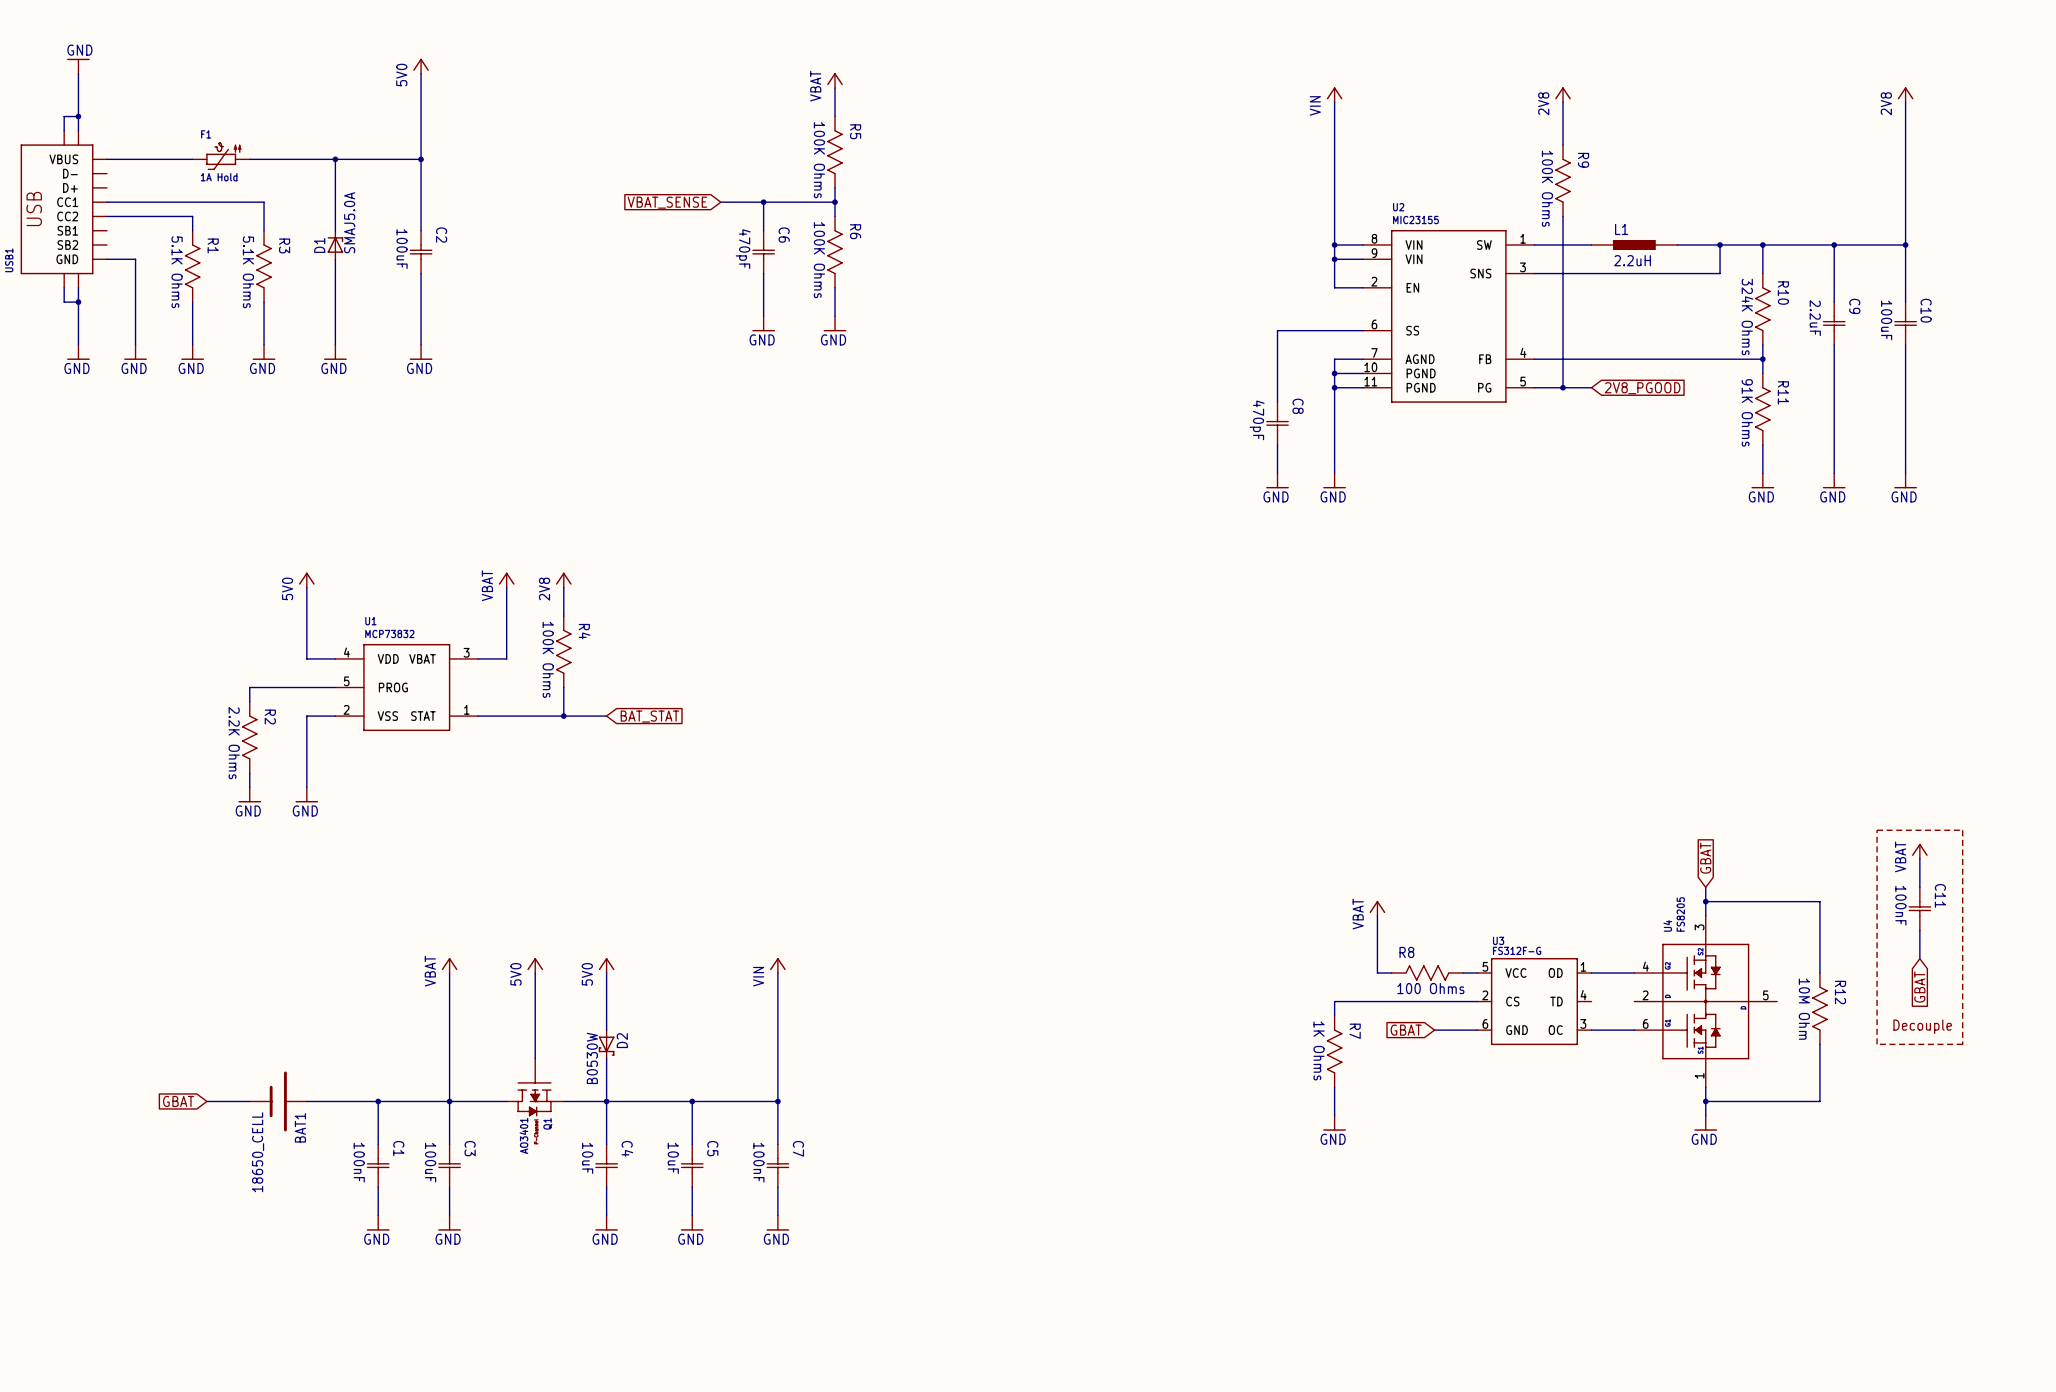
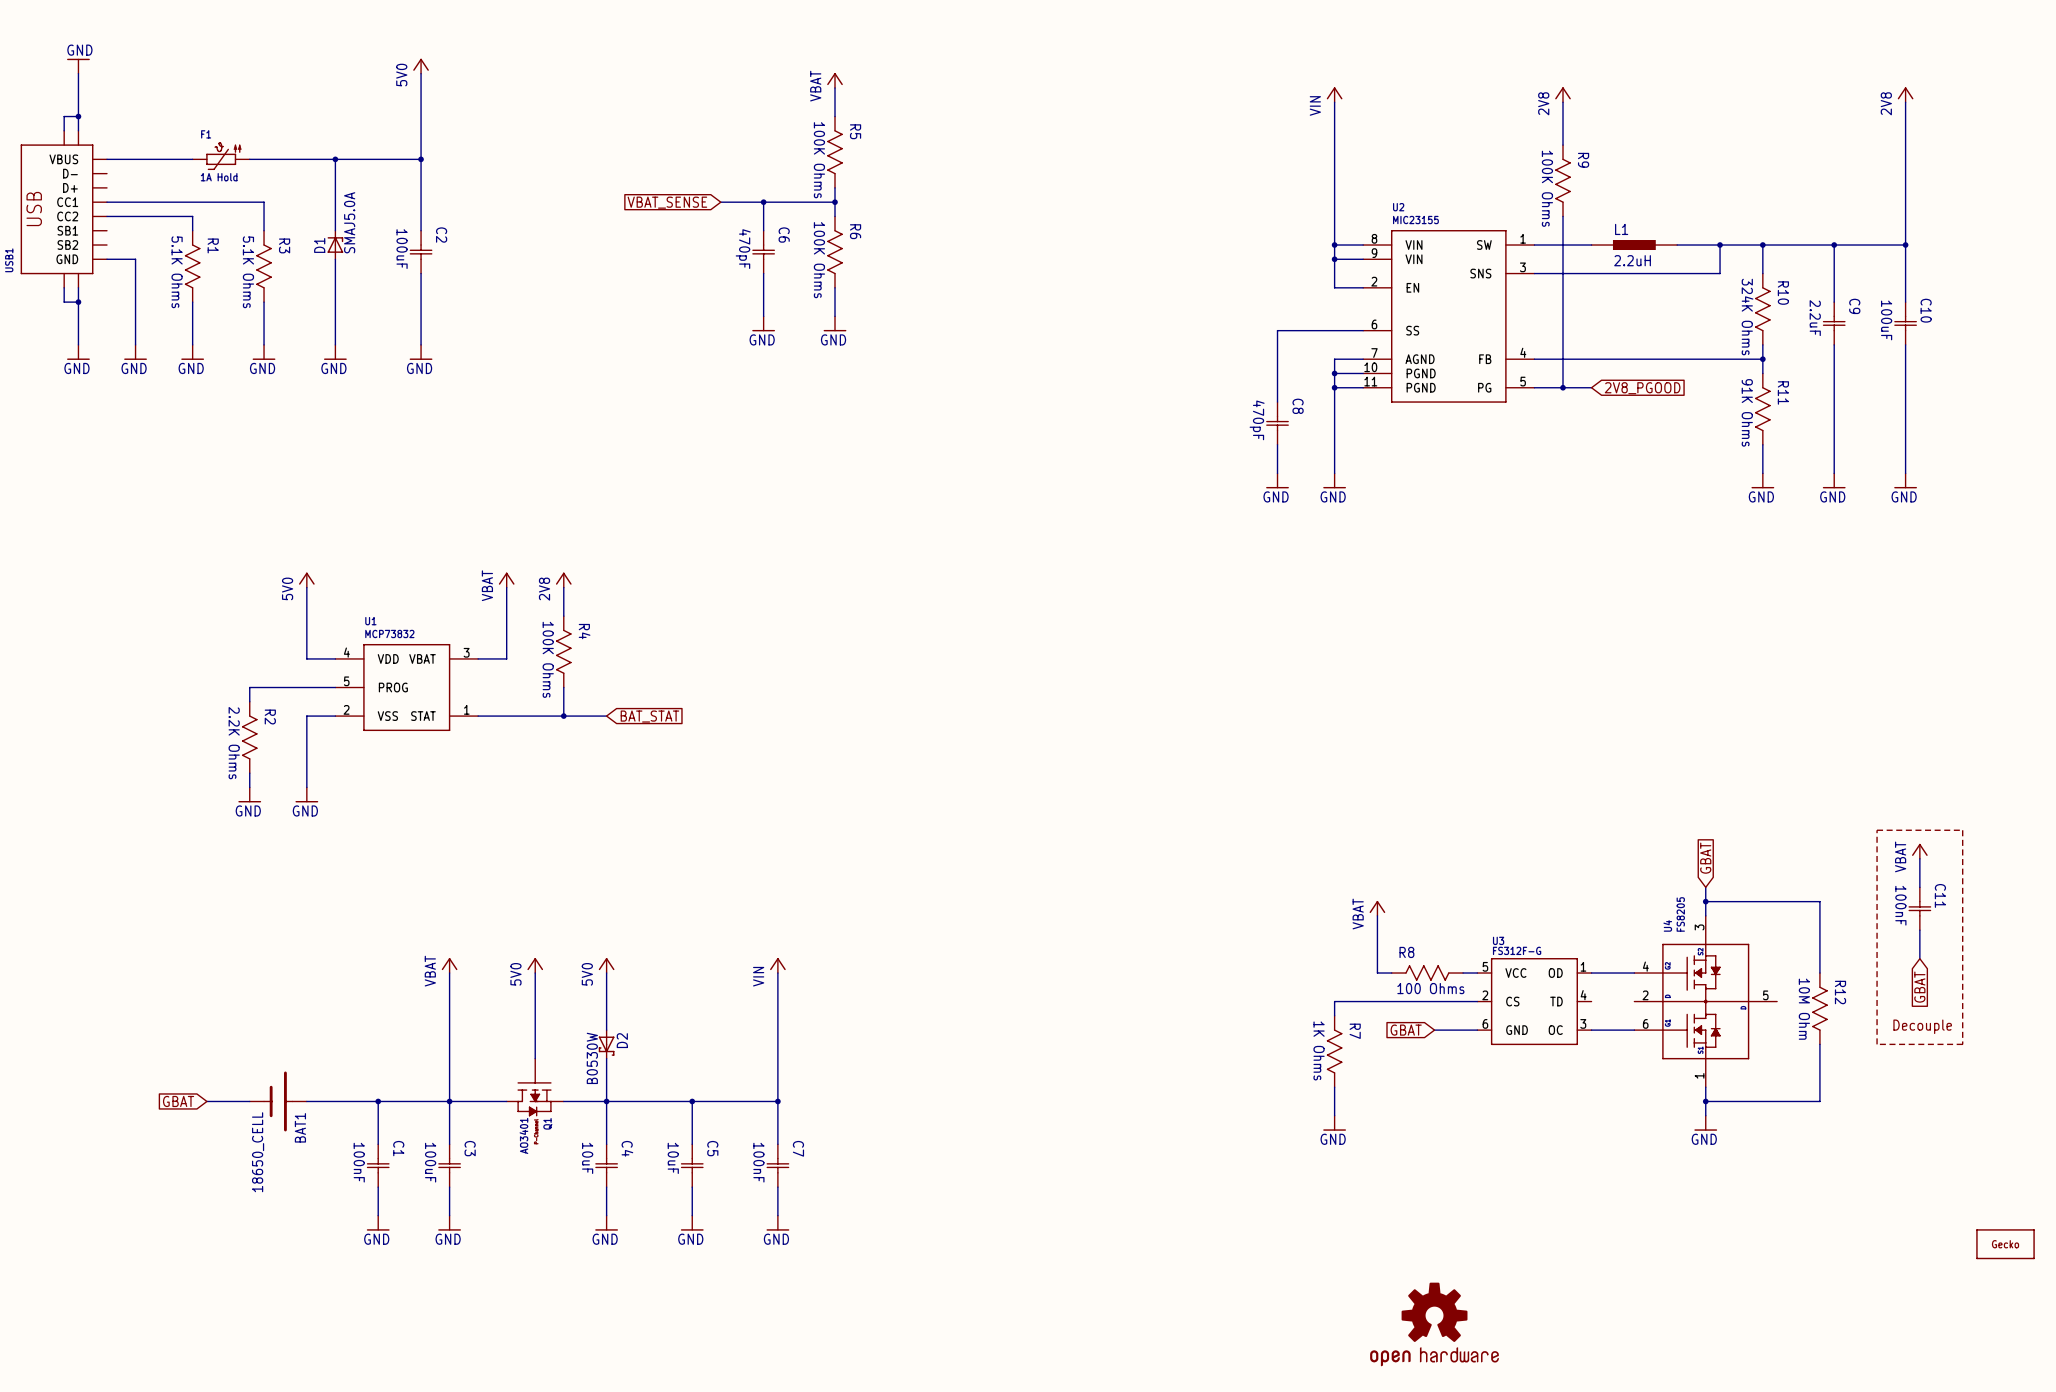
part: none -> (2005, 1244)
part: none -> (1434, 1324)

